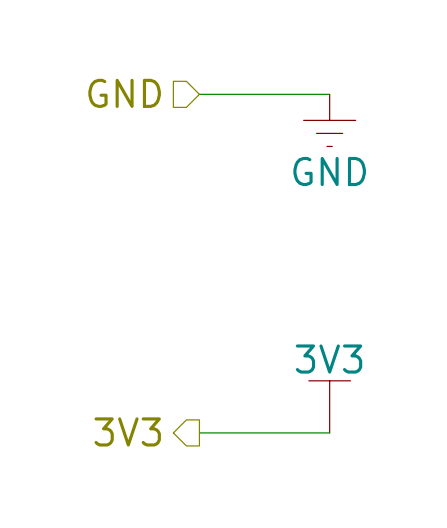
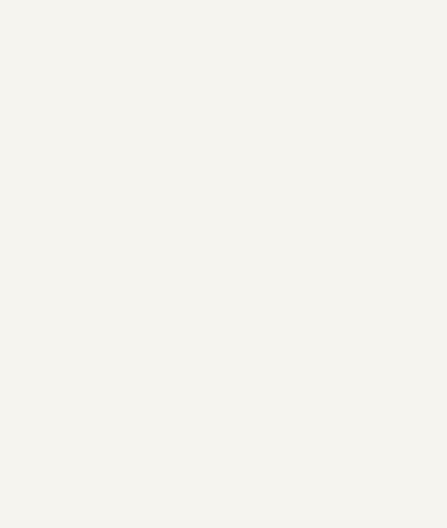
hierarchical label: GND (124, 93) -> none
wire: (199, 94) (329, 94) -> none
power symbol: GND (329, 120) -> none
power symbol: 3V3 (329, 406) -> none
hierarchical label: 3V3 (127, 431) -> none
wire: (199, 432) (329, 432) -> none

